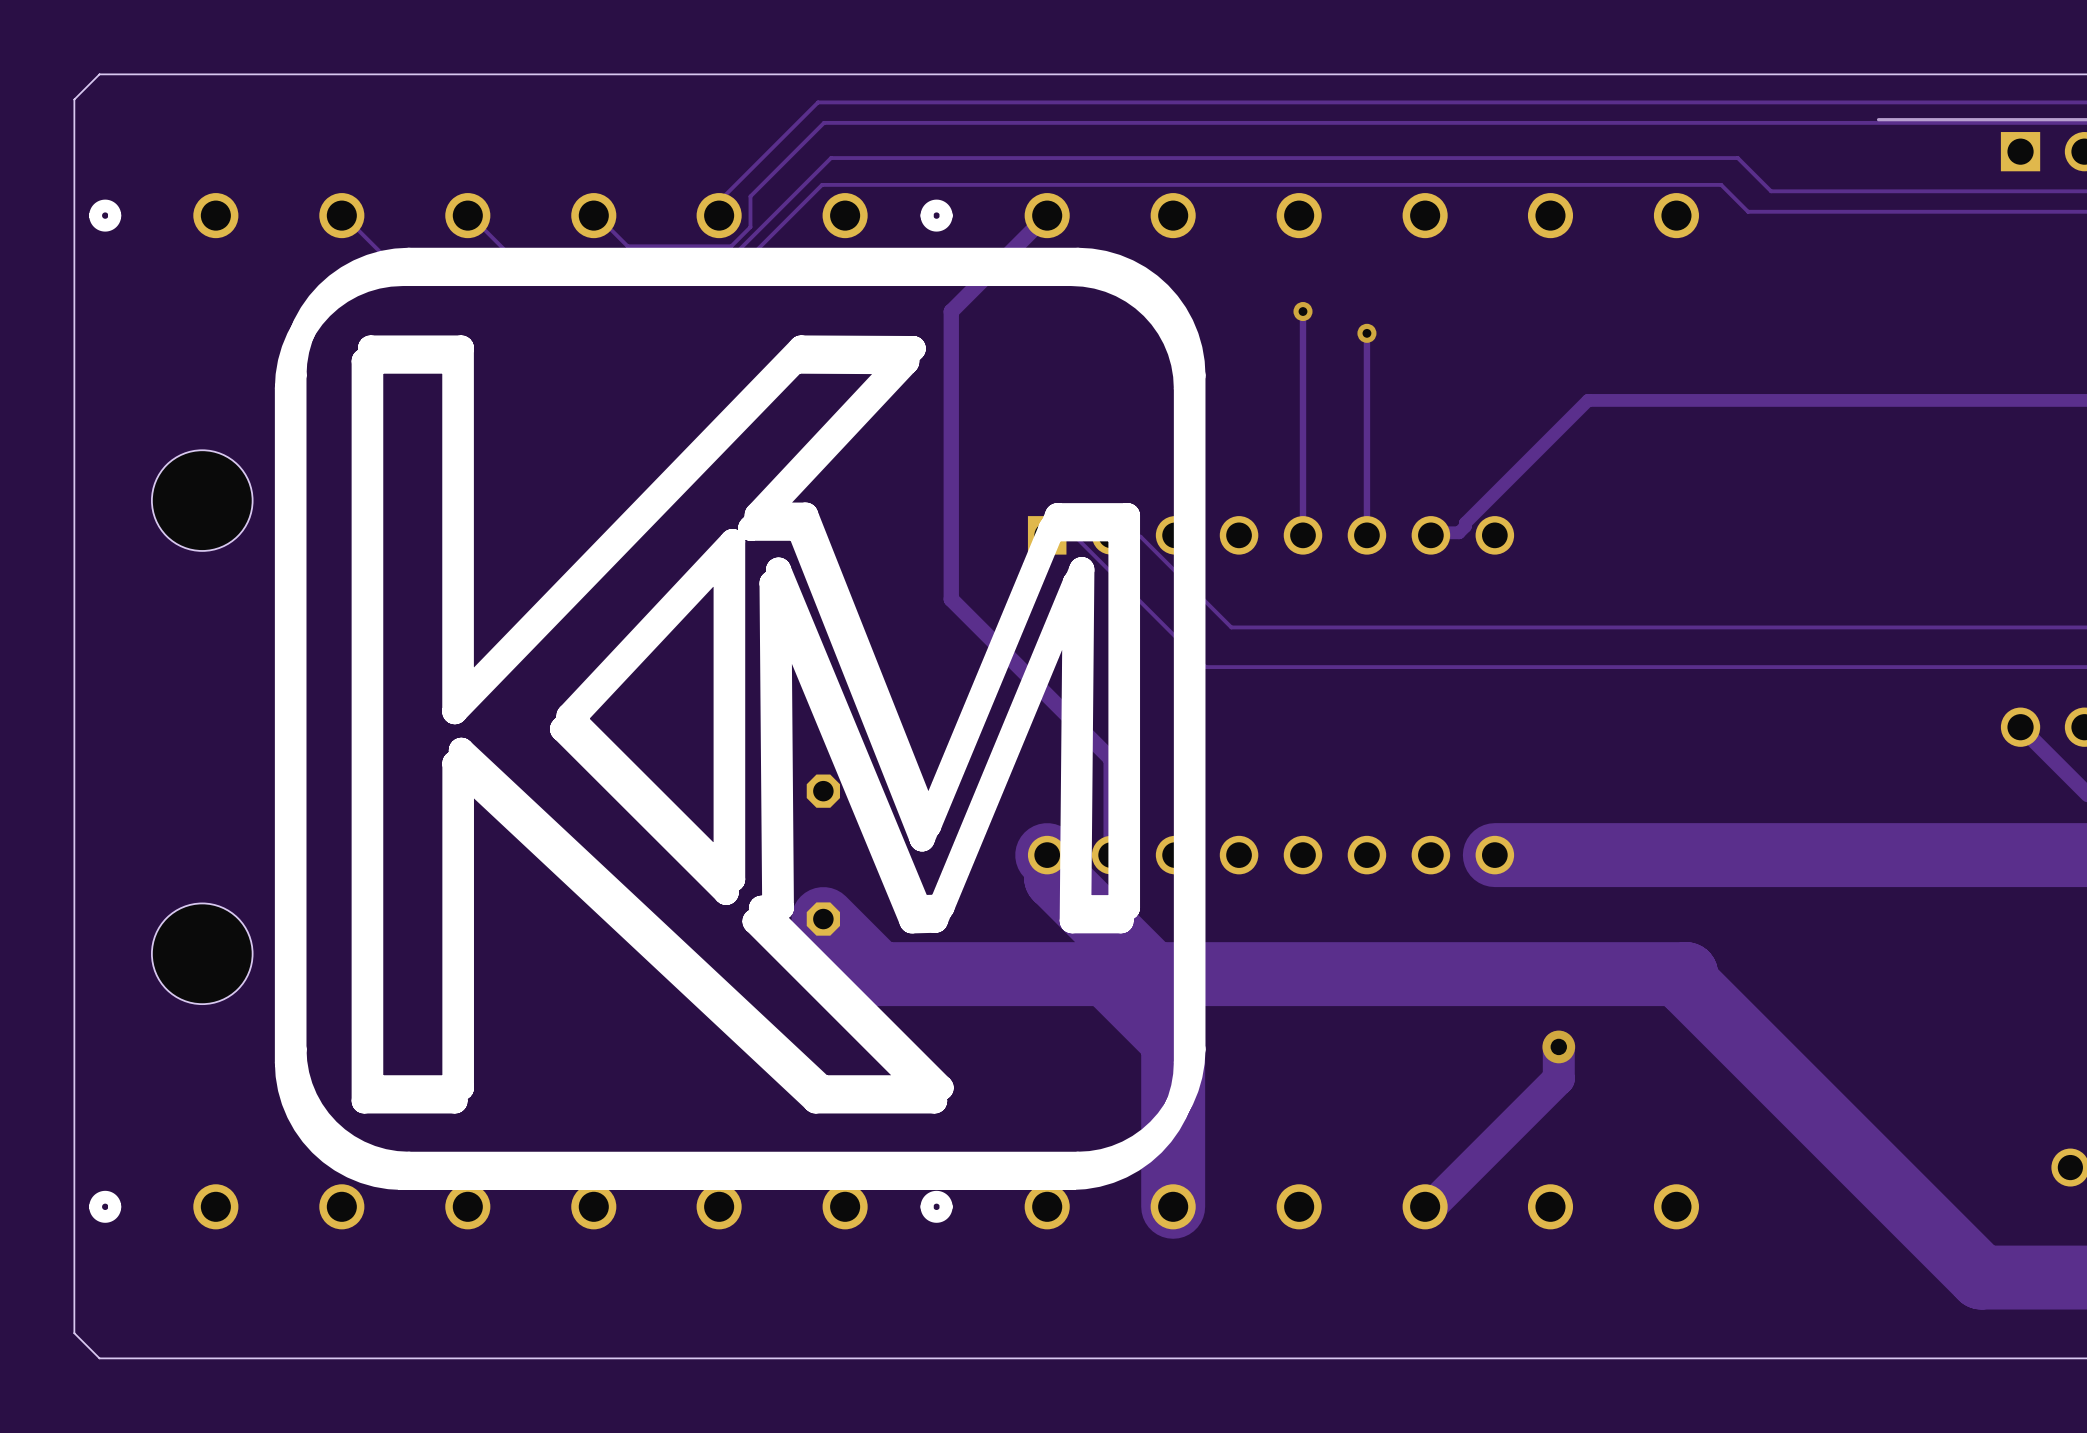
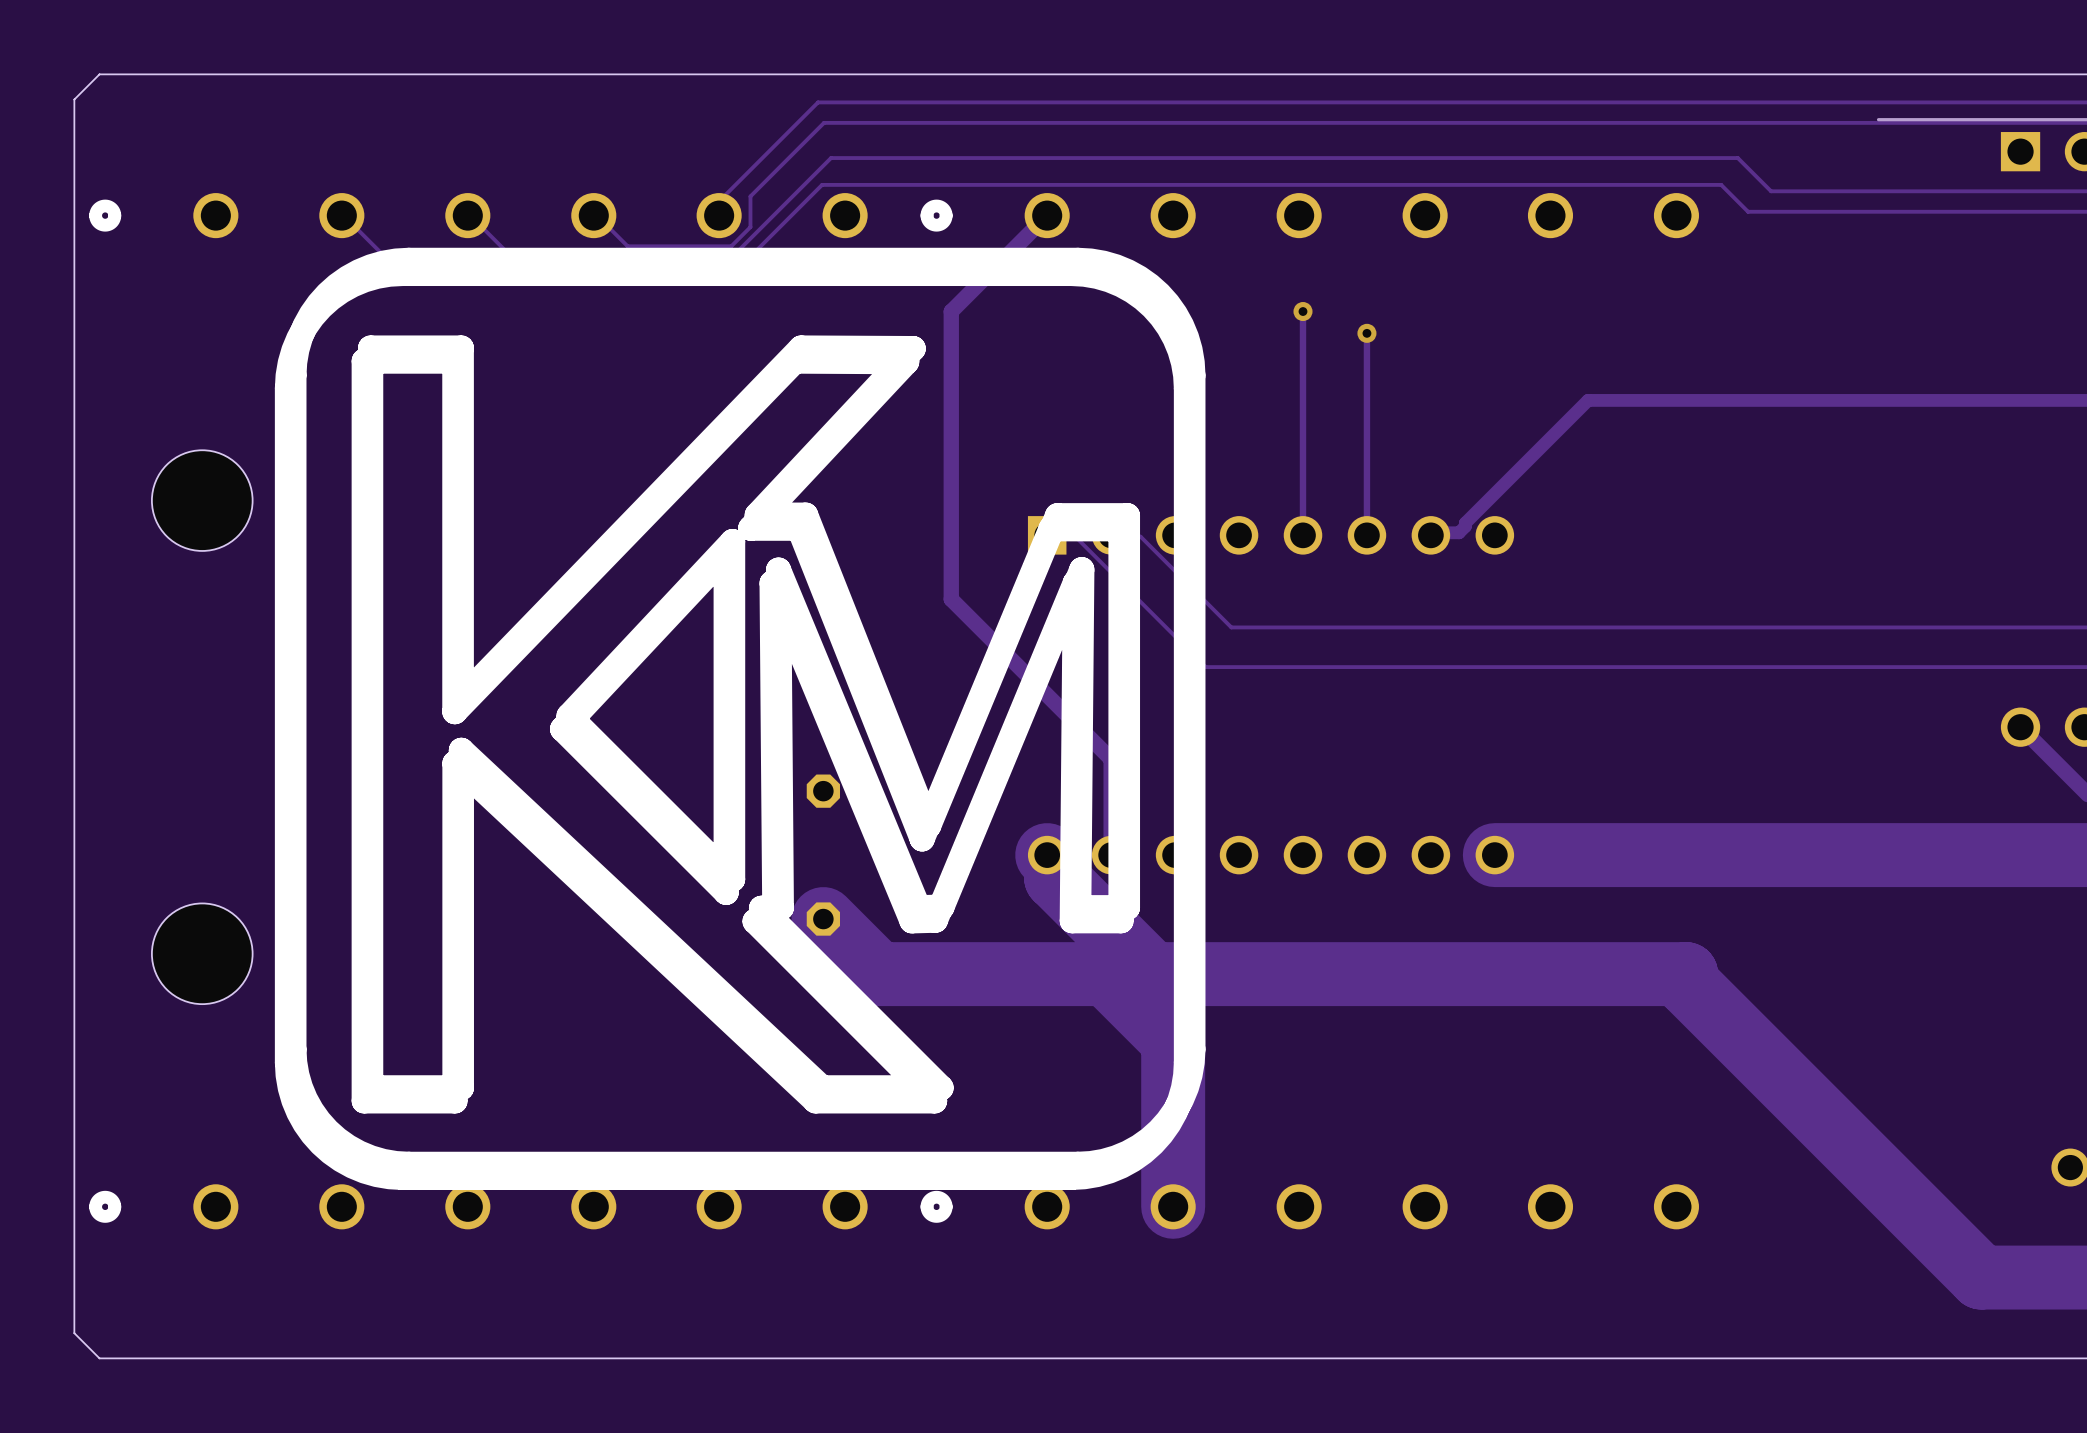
track: (1558, 1046) (1558, 1078) (1430, 1206) (1425, 1206) -> none
via: (1558, 1046) -> none

